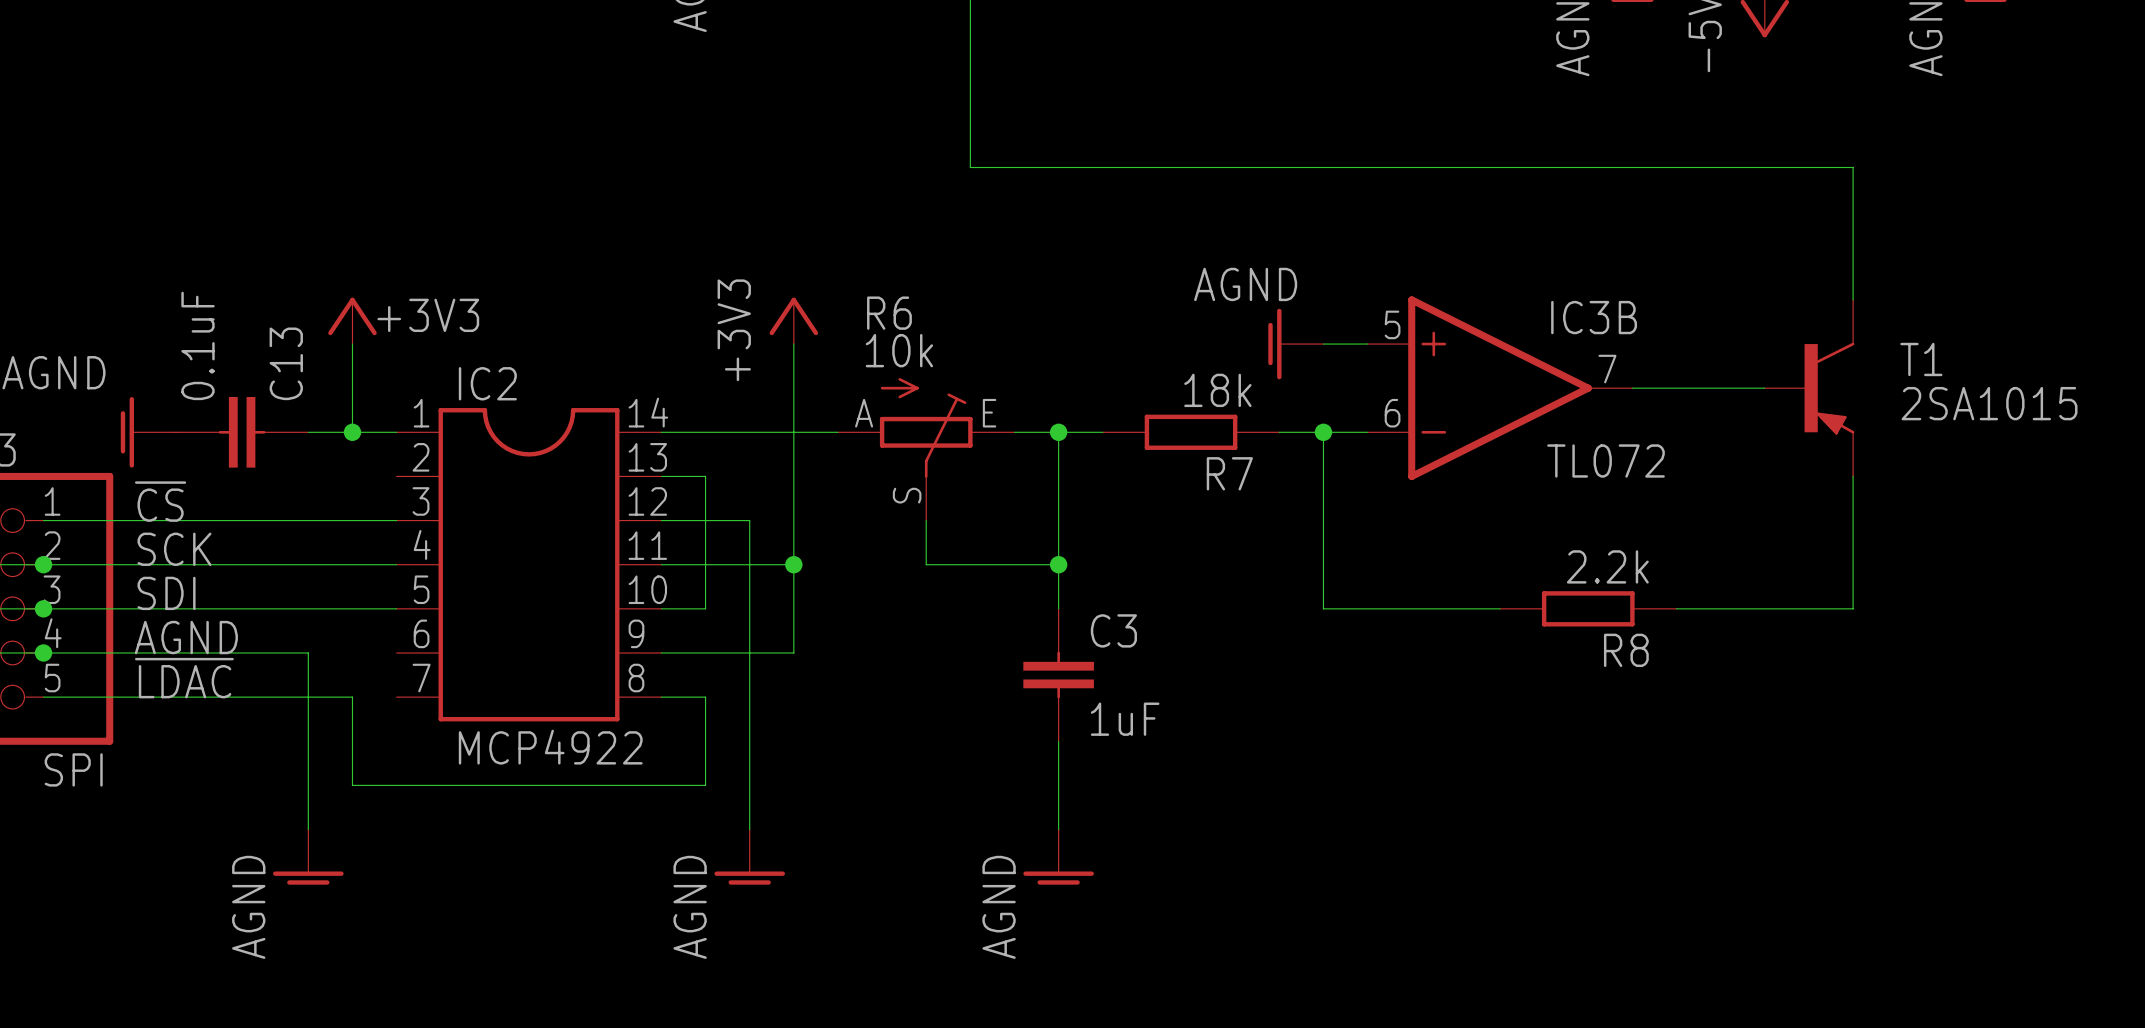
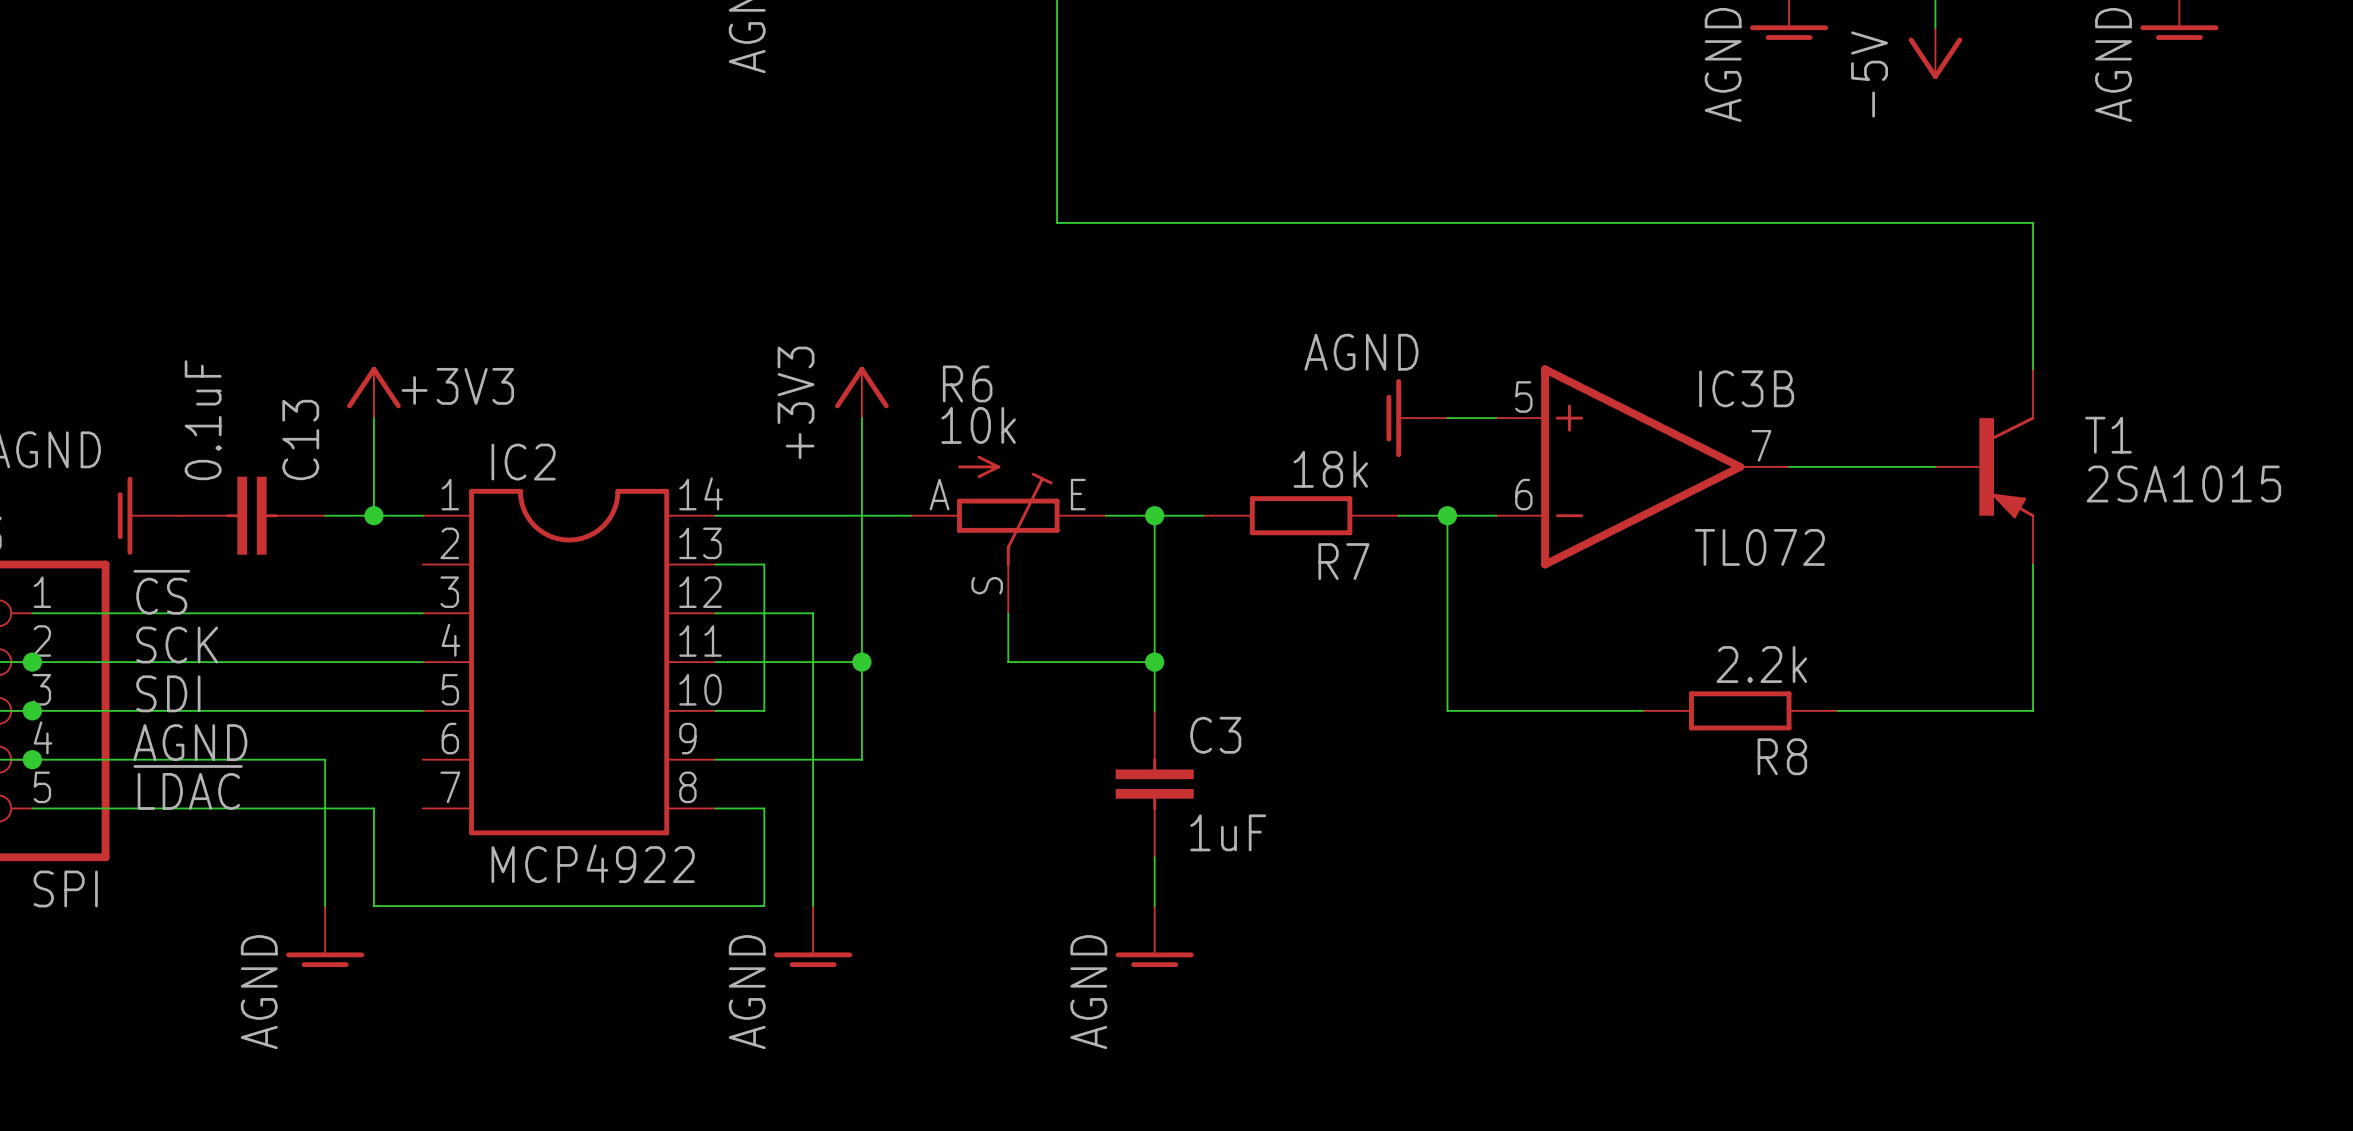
power symbol position: AGND (308, 857) -> AGND (325, 936)
power symbol position: AGND (749, 857) -> AGND (813, 936)
power symbol position: AGND (1058, 857) -> AGND (1154, 936)

